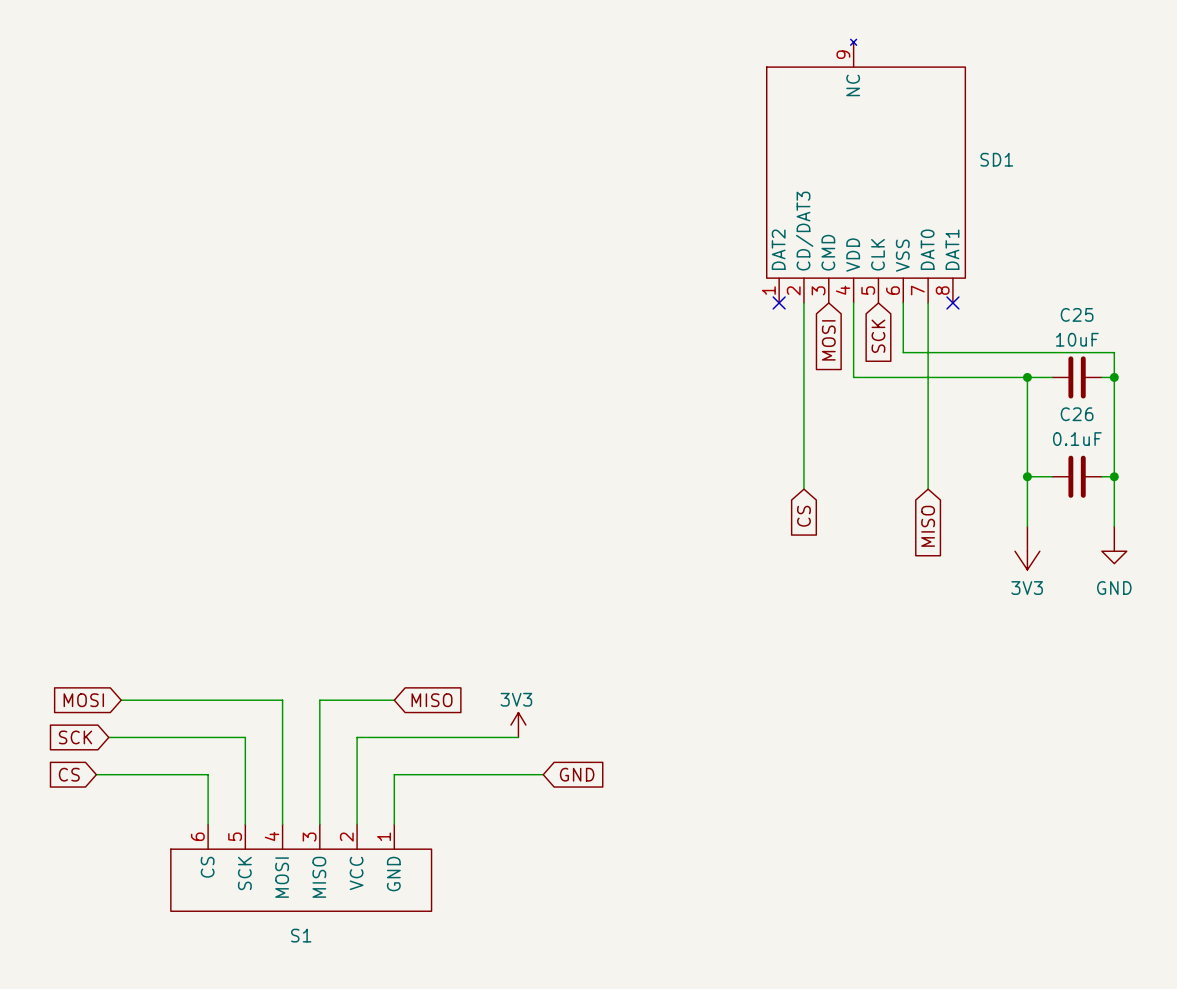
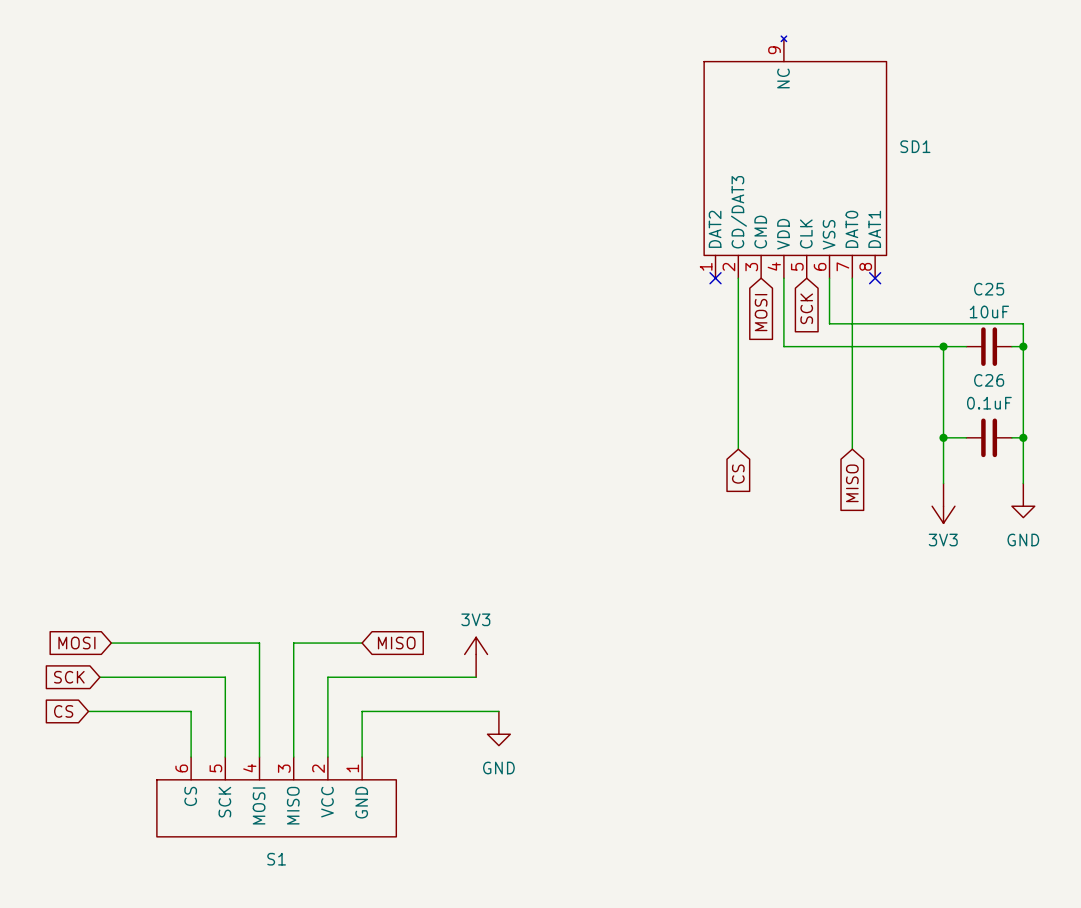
power symbol shape: [510, 712, 526, 738] -> [464, 637, 488, 678]
global label: GND (577, 774) -> none
power symbol: none -> GND (498, 728)

